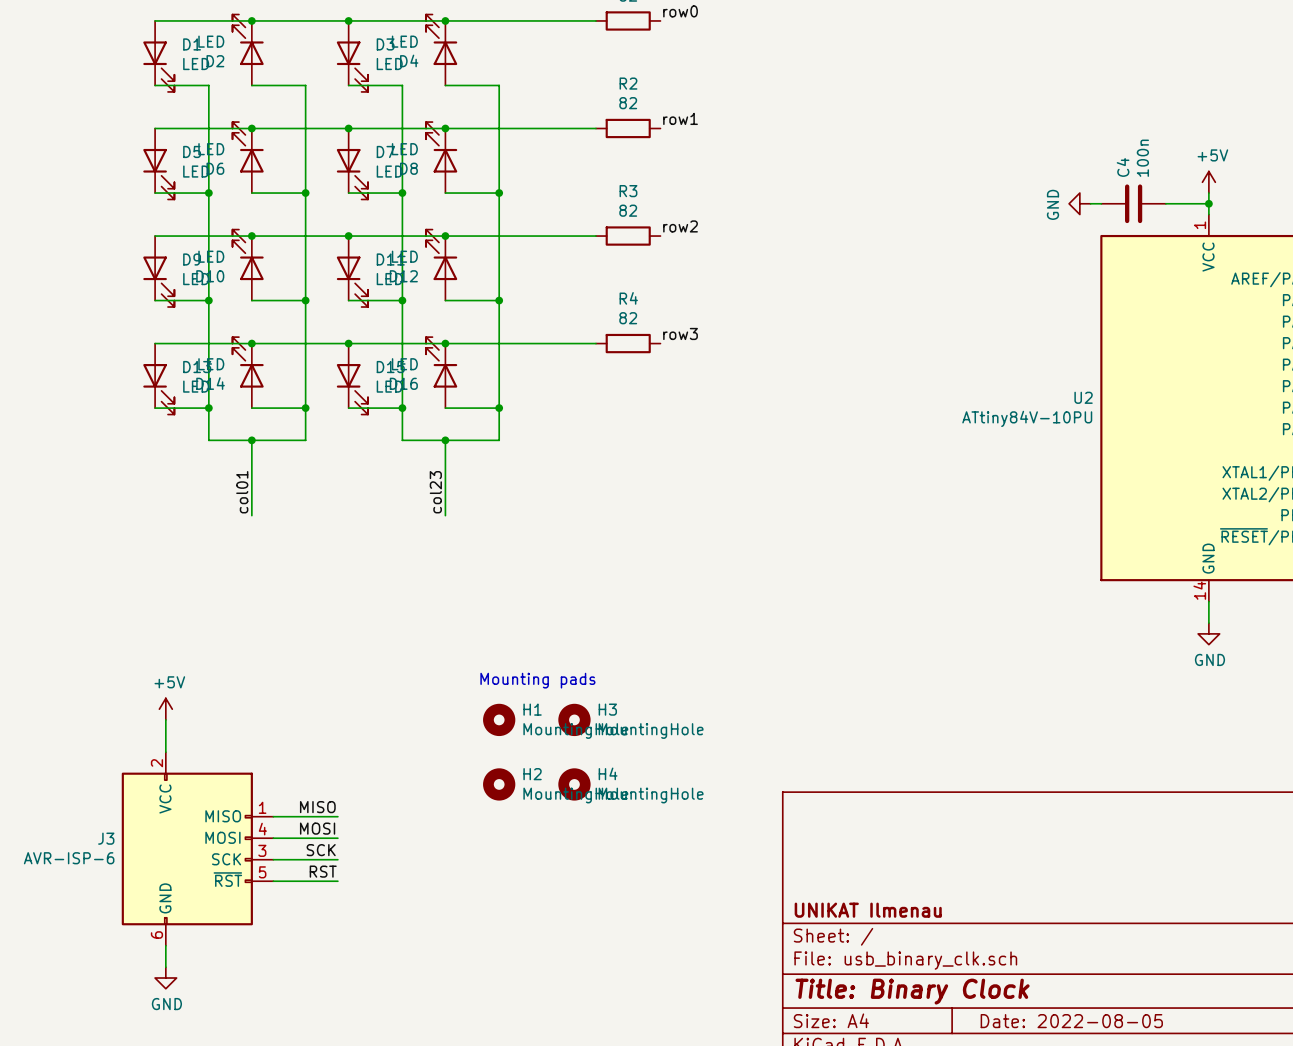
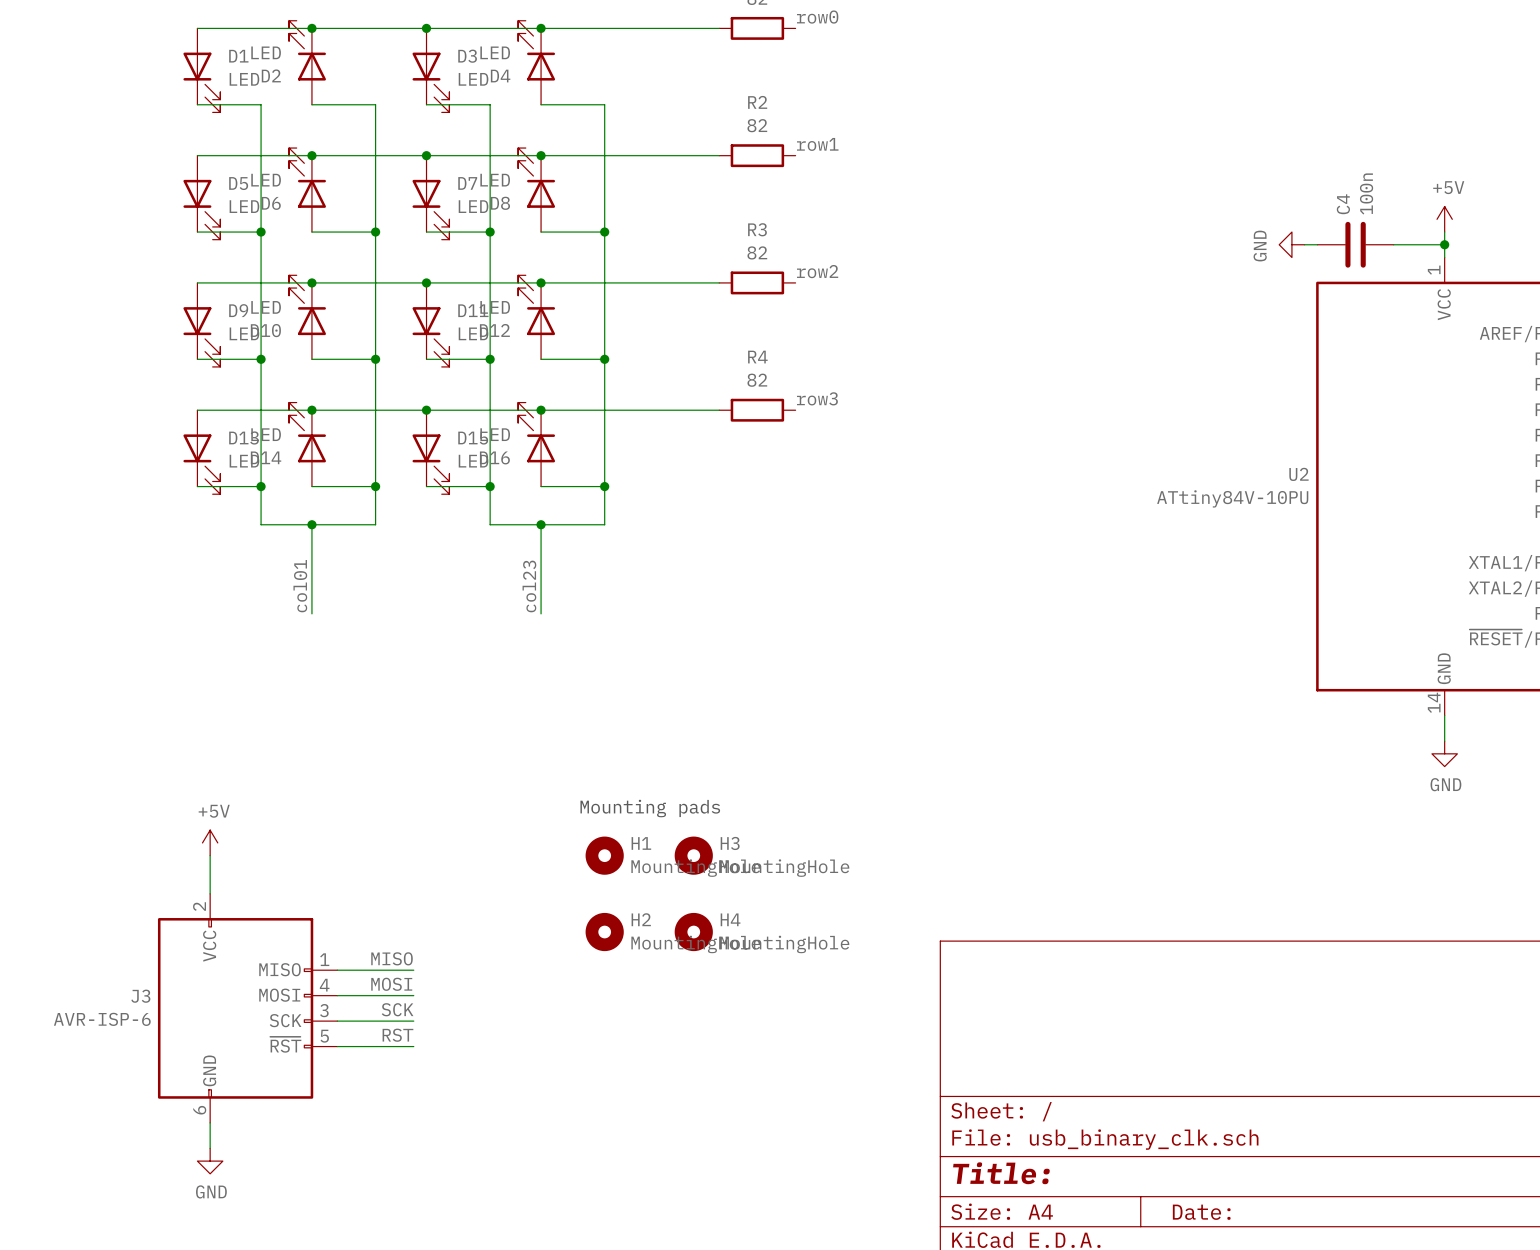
title block: UNIKAT Ilmenau (868, 910) -> none
title block: Title: Binary Clock (912, 991) -> Title: (1001, 1173)
title block: Date: 2022-08-05 (1071, 1021) -> Date: (1201, 1212)

